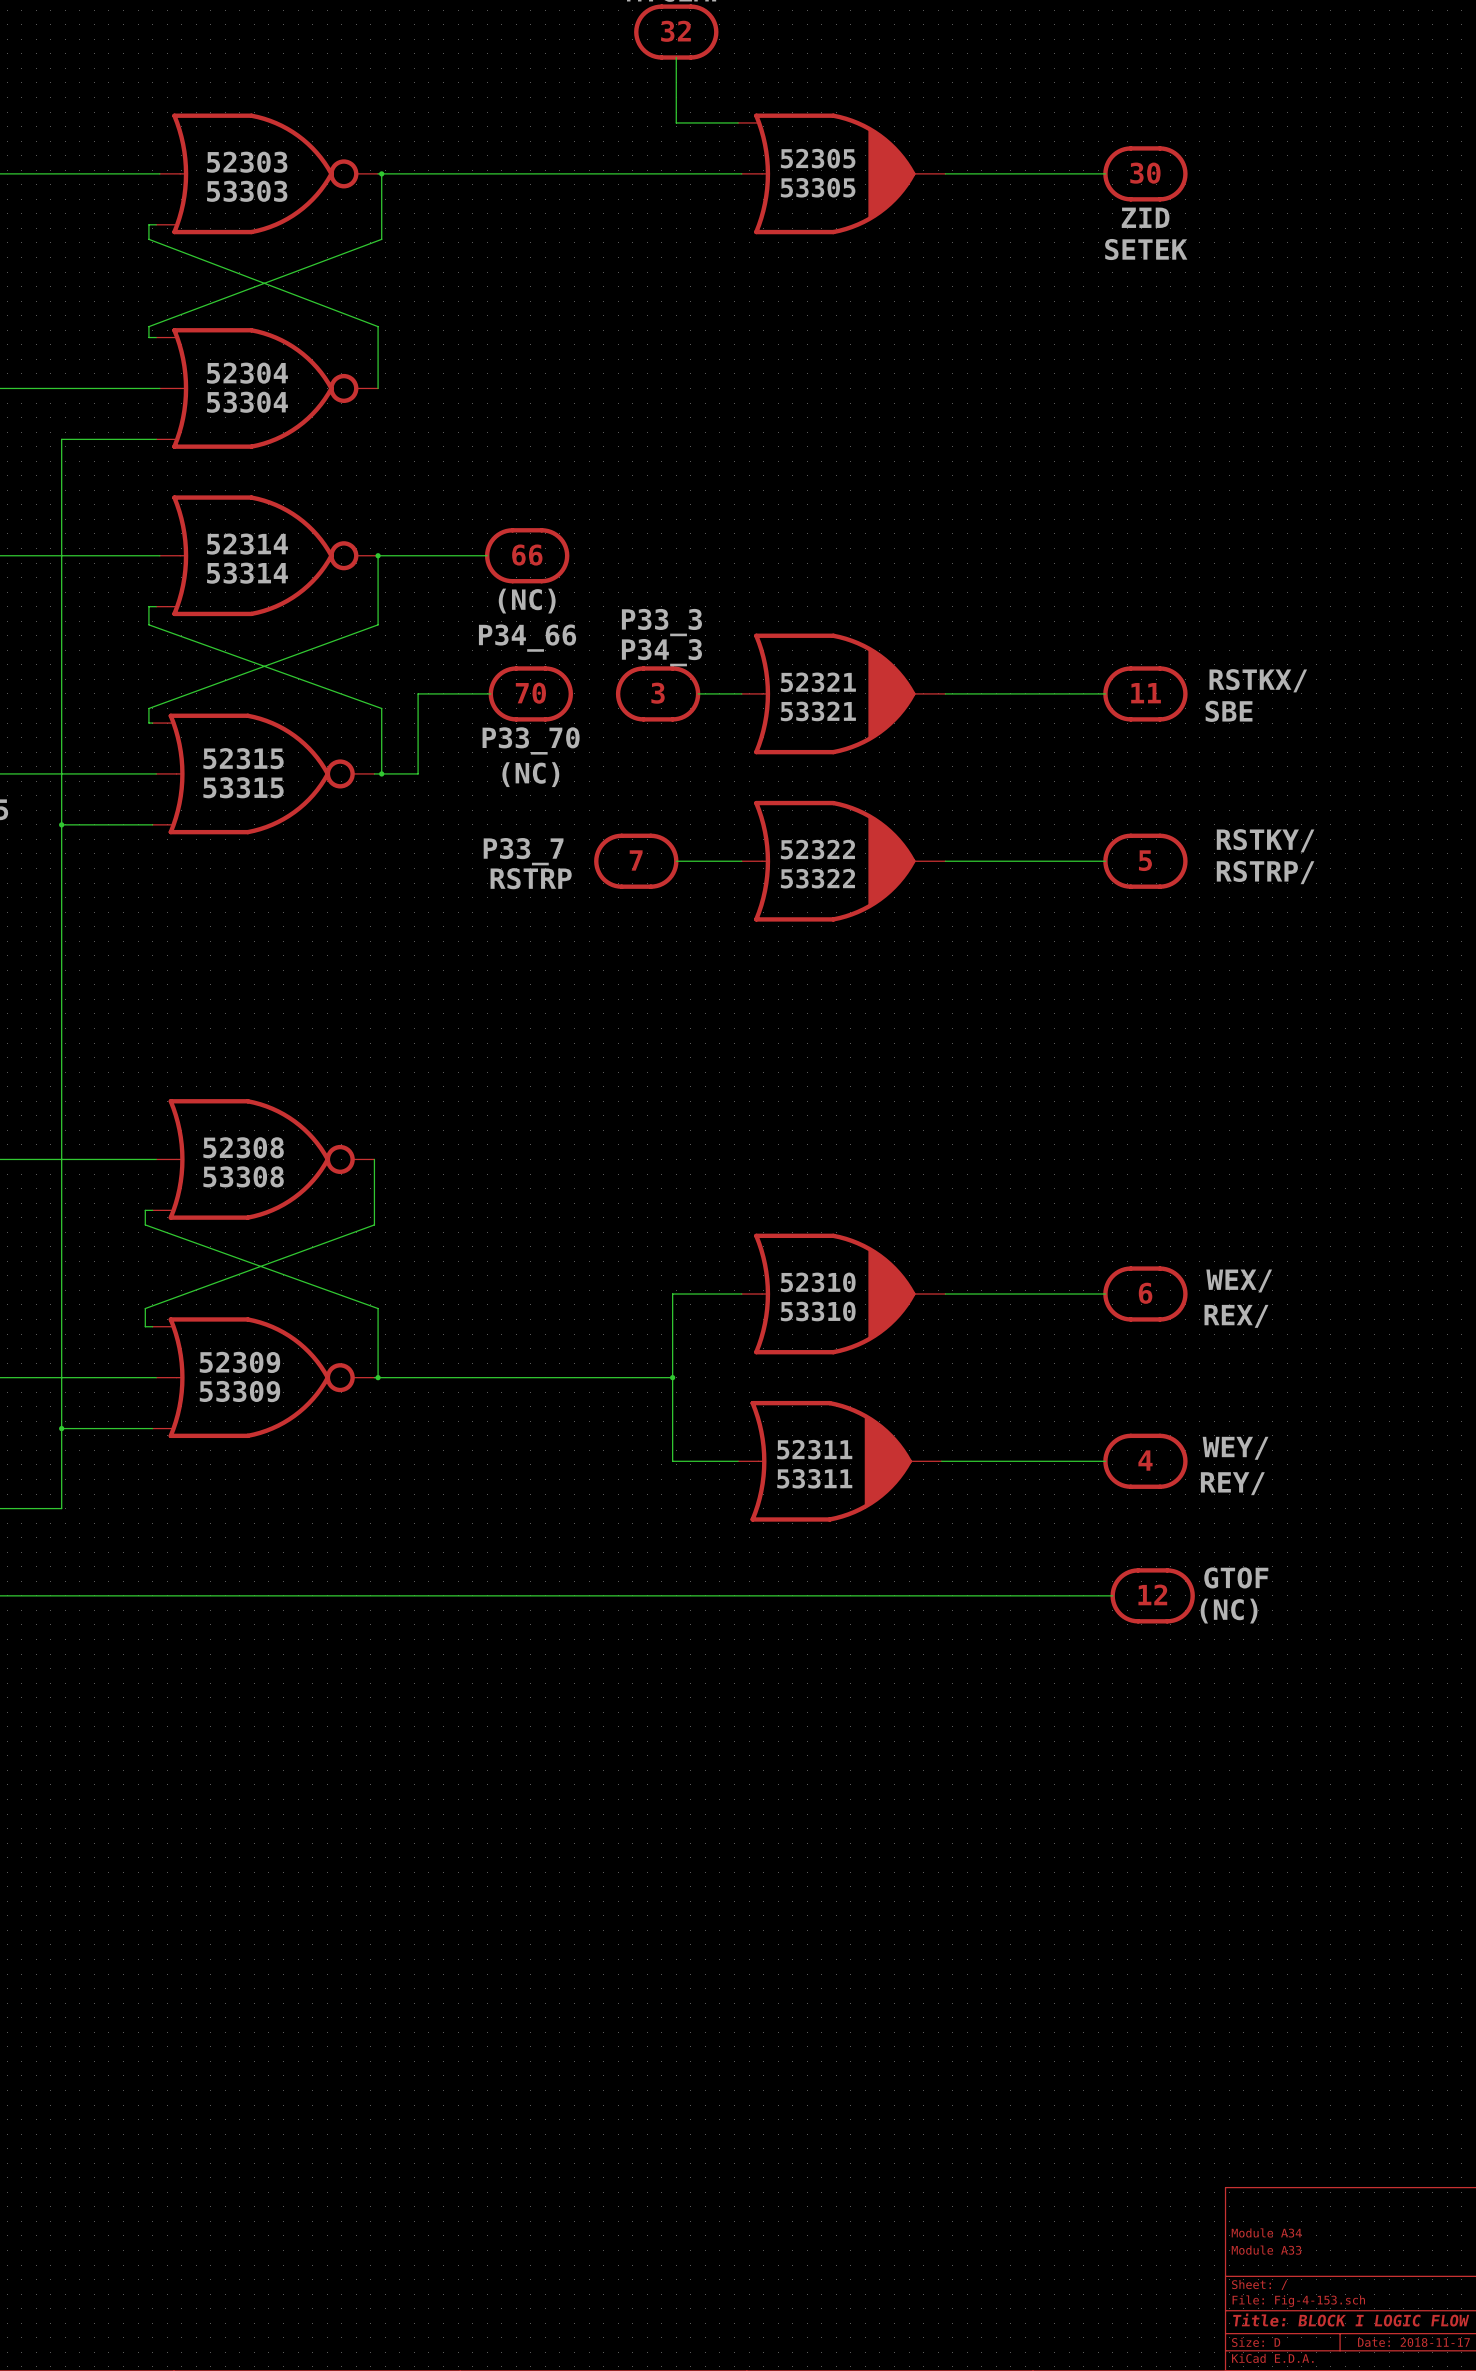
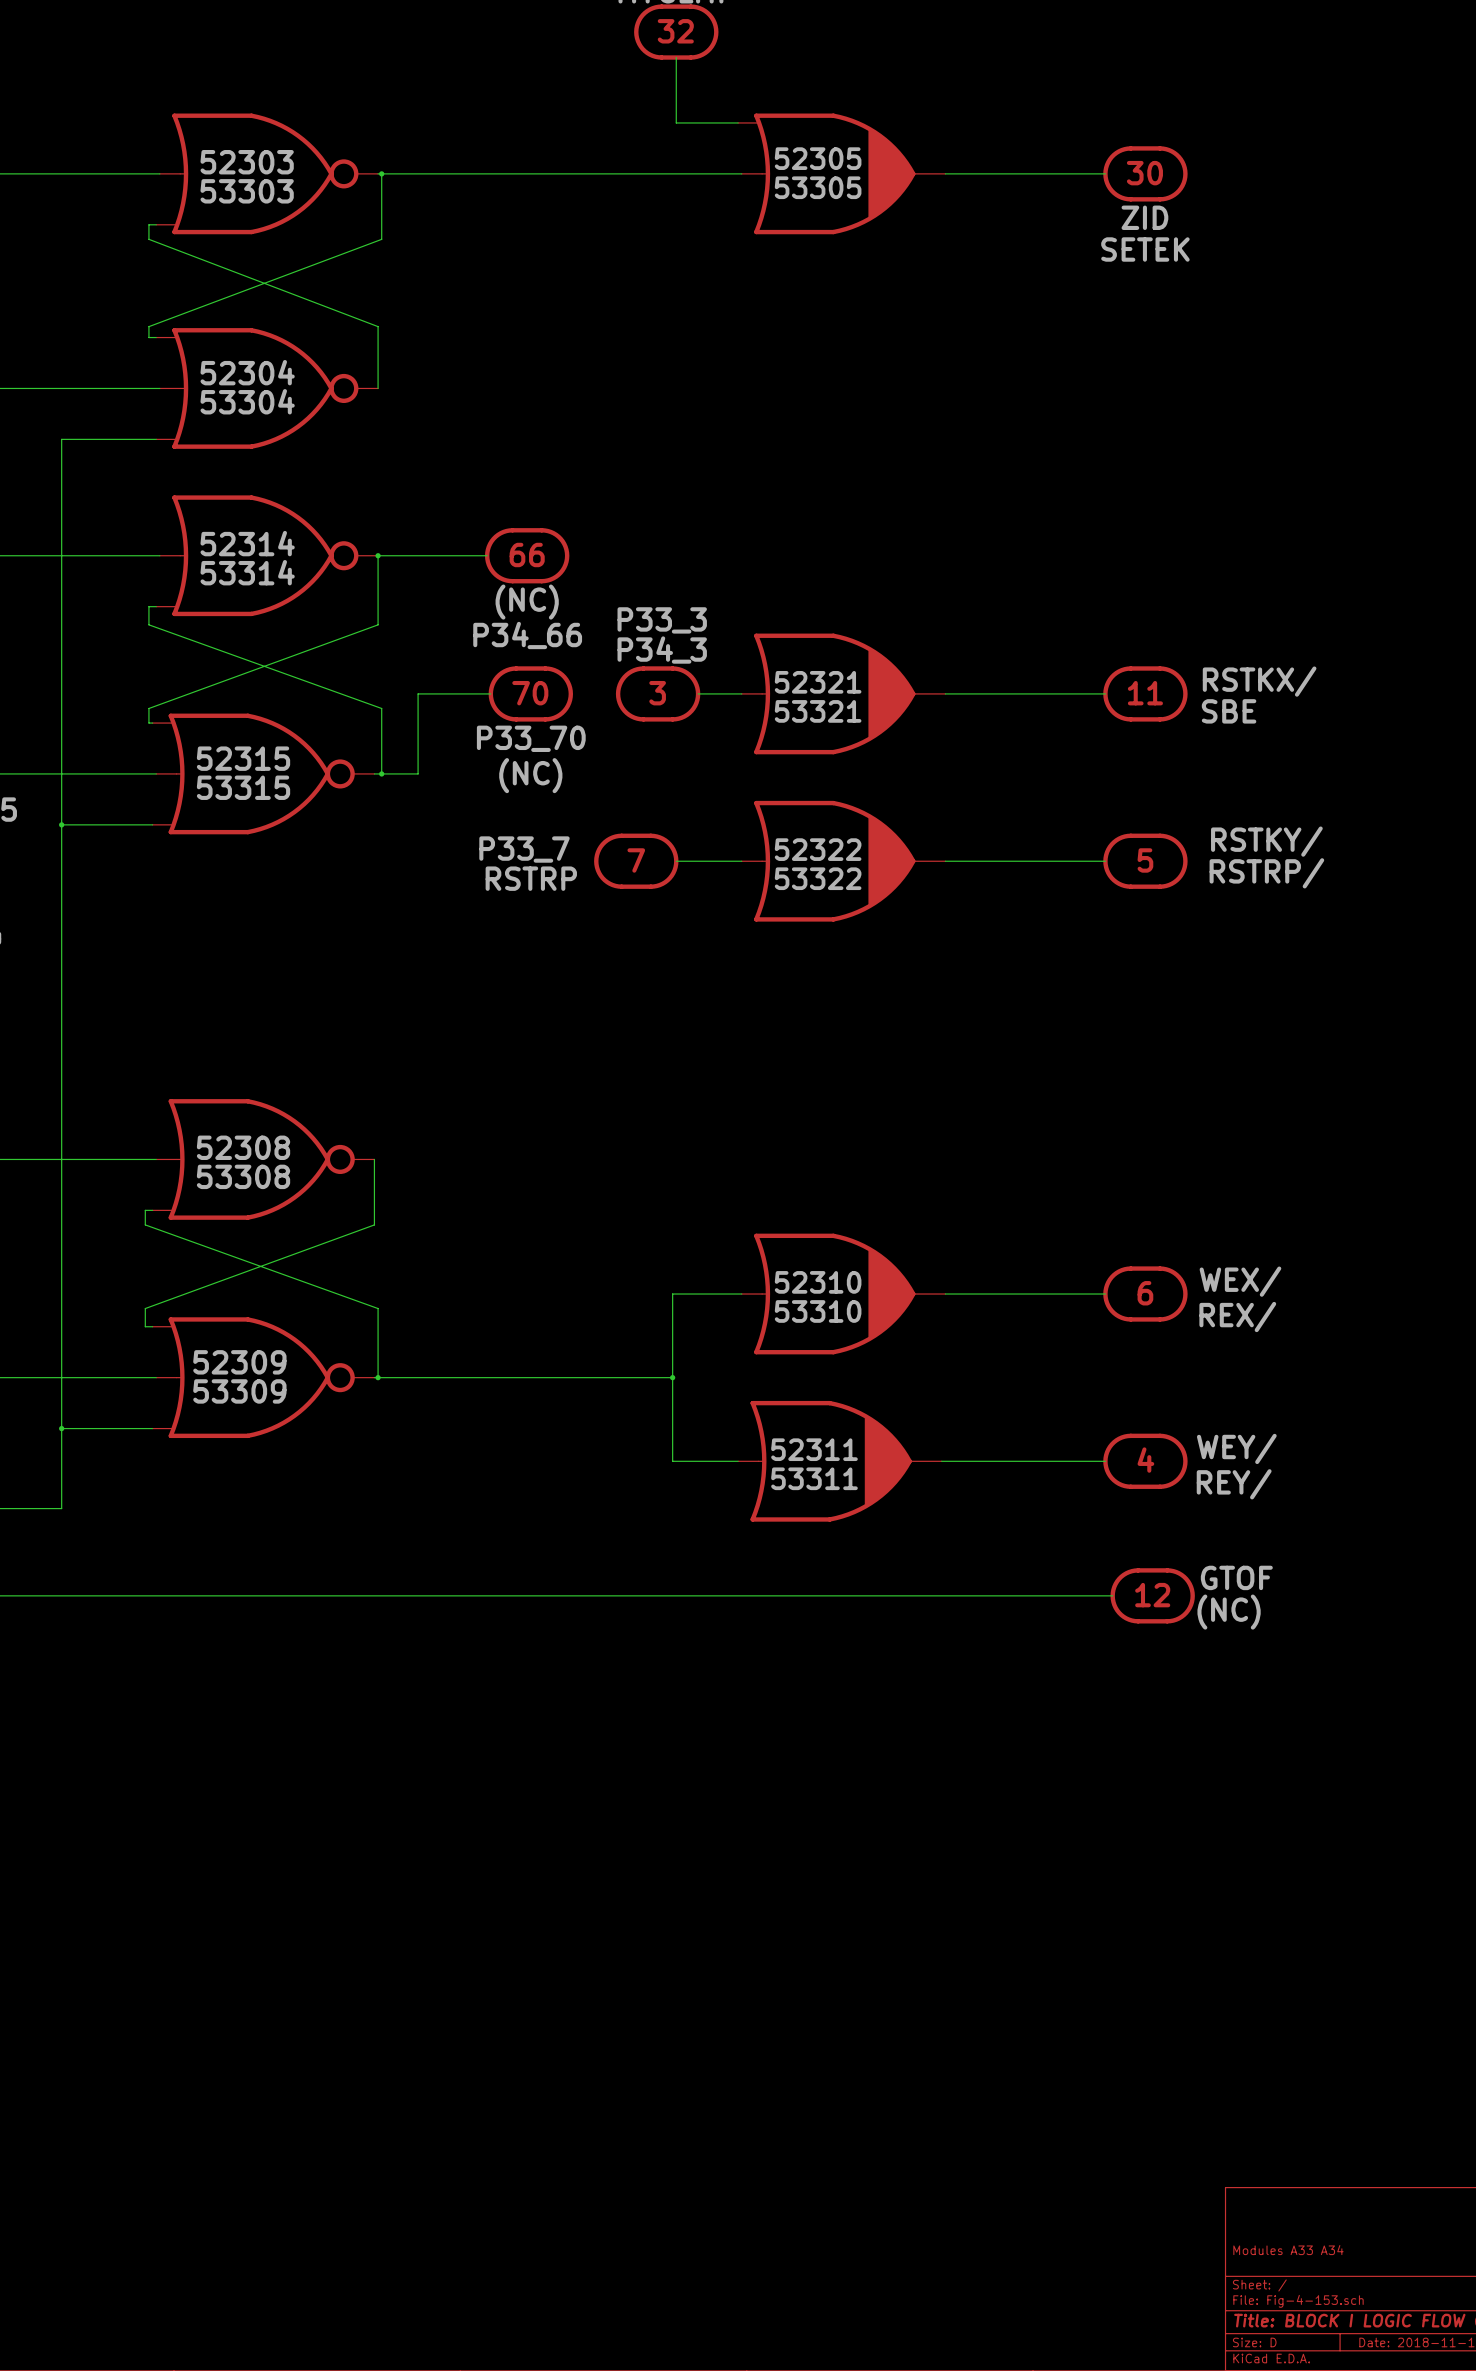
title block: Module A34 (1266, 2232) -> none
title block: Module A33 (1266, 2250) -> Modules A33 A34 (1288, 2250)

